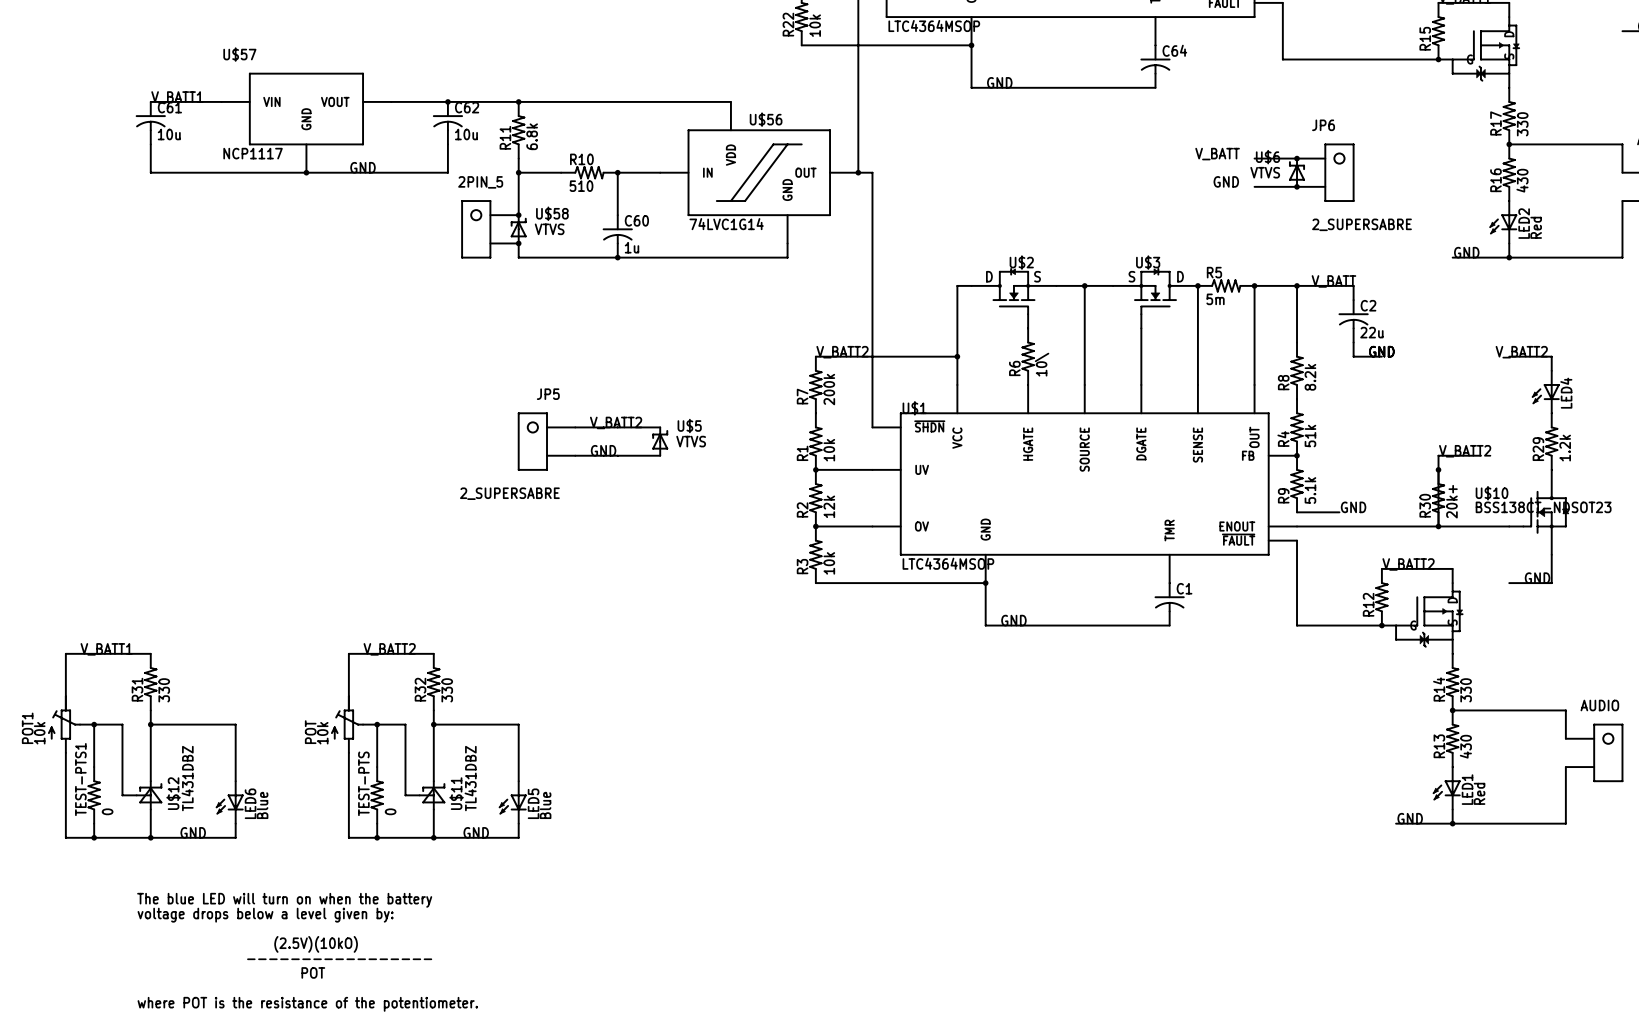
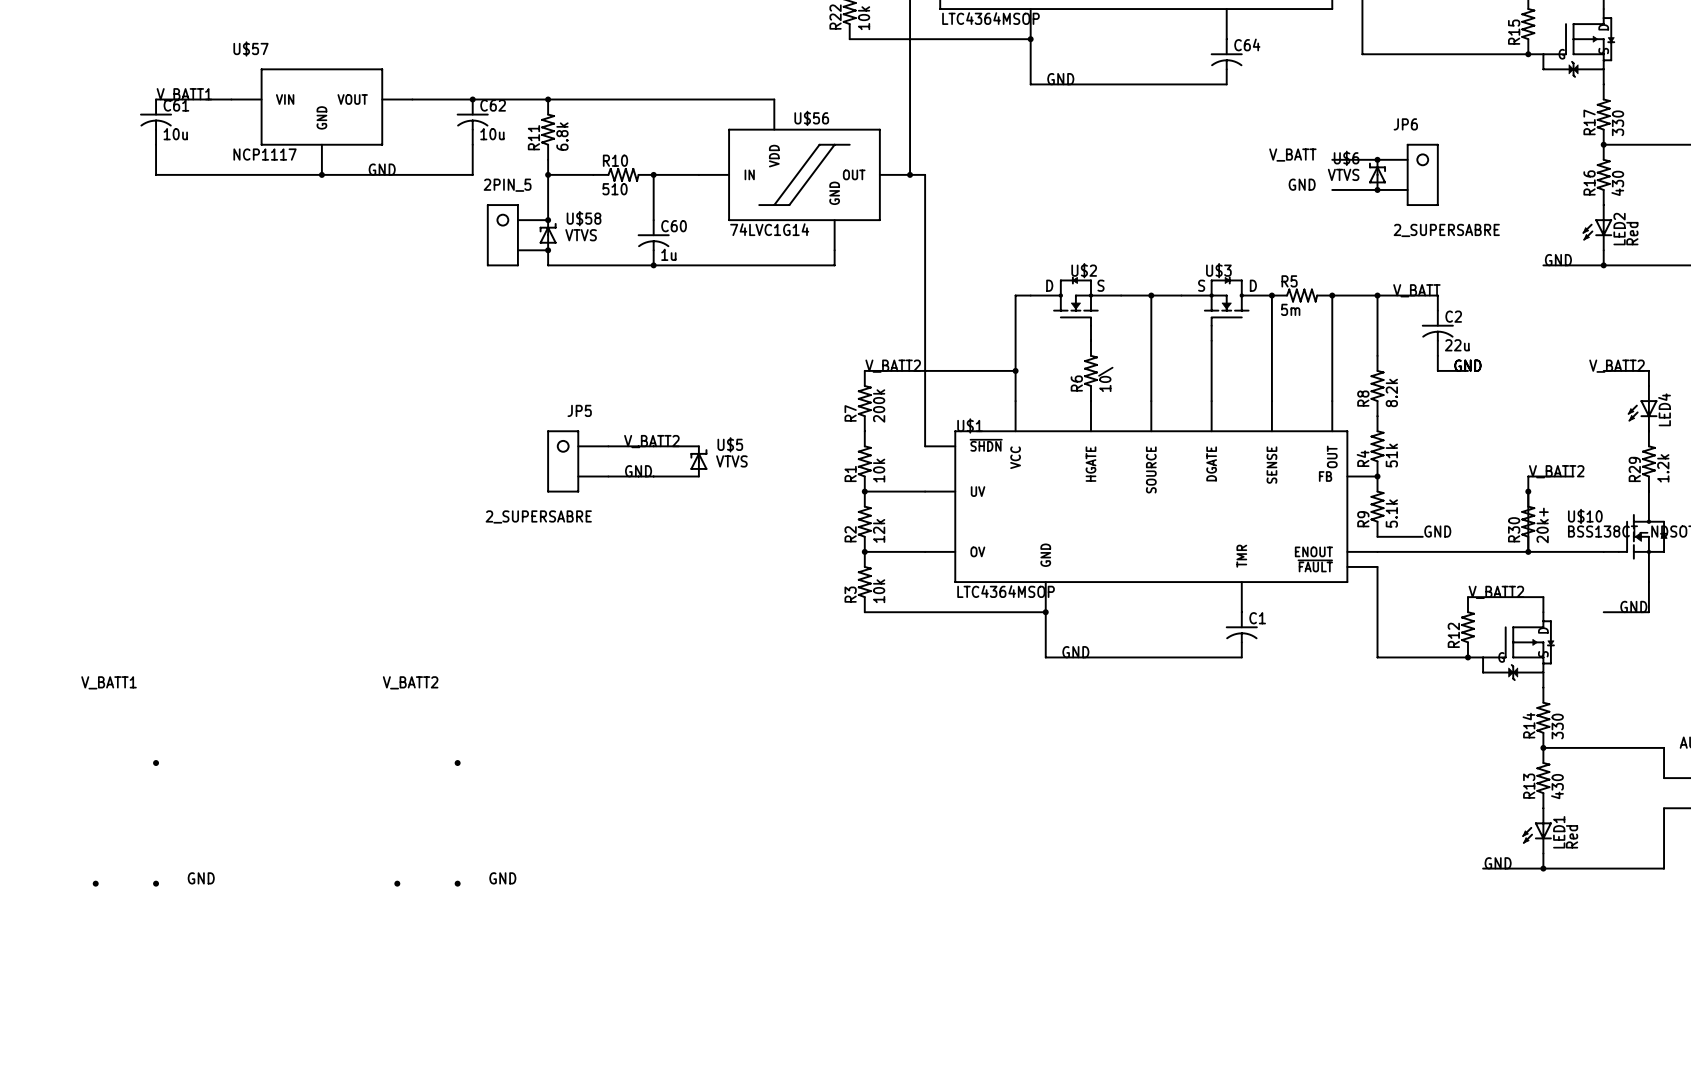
wire: (150, 653) (65, 653) (65, 696) -> none
wire: (433, 653) (348, 653) (348, 696) -> none
R31: 330 (150, 682) -> none
R32: 330 (433, 682) -> none
wire: (150, 710) (150, 781) -> none
wire: (433, 710) (433, 781) -> none
POT1: 10k (71, 724) -> none
junction: (94, 724) -> none
wire: (150, 724) (235, 724) (235, 781) -> none
POT: 10k (354, 724) -> none
junction: (377, 724) -> none
wire: (433, 724) (518, 724) (518, 781) -> none
wire: (65, 752) (65, 837) (235, 837) (235, 823) -> none
wire: (348, 752) (348, 837) (518, 837) (518, 823) -> none
wire: (94, 767) (94, 724) (122, 724) (122, 795) (136, 795) -> none
wire: (377, 767) (377, 724) (405, 724) (405, 795) (419, 795) -> none
TEST-PTS1: 0 (94, 795) -> none
U$12: TL431DBZ (149, 795) -> none
TEST-PTS: 0 (377, 795) -> none
U$11: TL431DBZ (432, 795) -> none
LED6: Blue (229, 802) -> none
LED5: Blue (512, 802) -> none
wire: (150, 809) (150, 837) -> none
wire: (433, 809) (433, 837) -> none
wire: (94, 823) (94, 837) -> none
wire: (377, 823) (377, 837) -> none
text: The blue LED will turn on when the battery (284, 900) -> none
text: voltage drops below a level given by: (265, 915) -> none
text: (2.5V)(10kO) (316, 944) -> none
text: ----------------- (339, 959) -> none
text: POT (313, 972) -> none
text: where POT is the resistance of the potentiometer. (307, 1004) -> none

